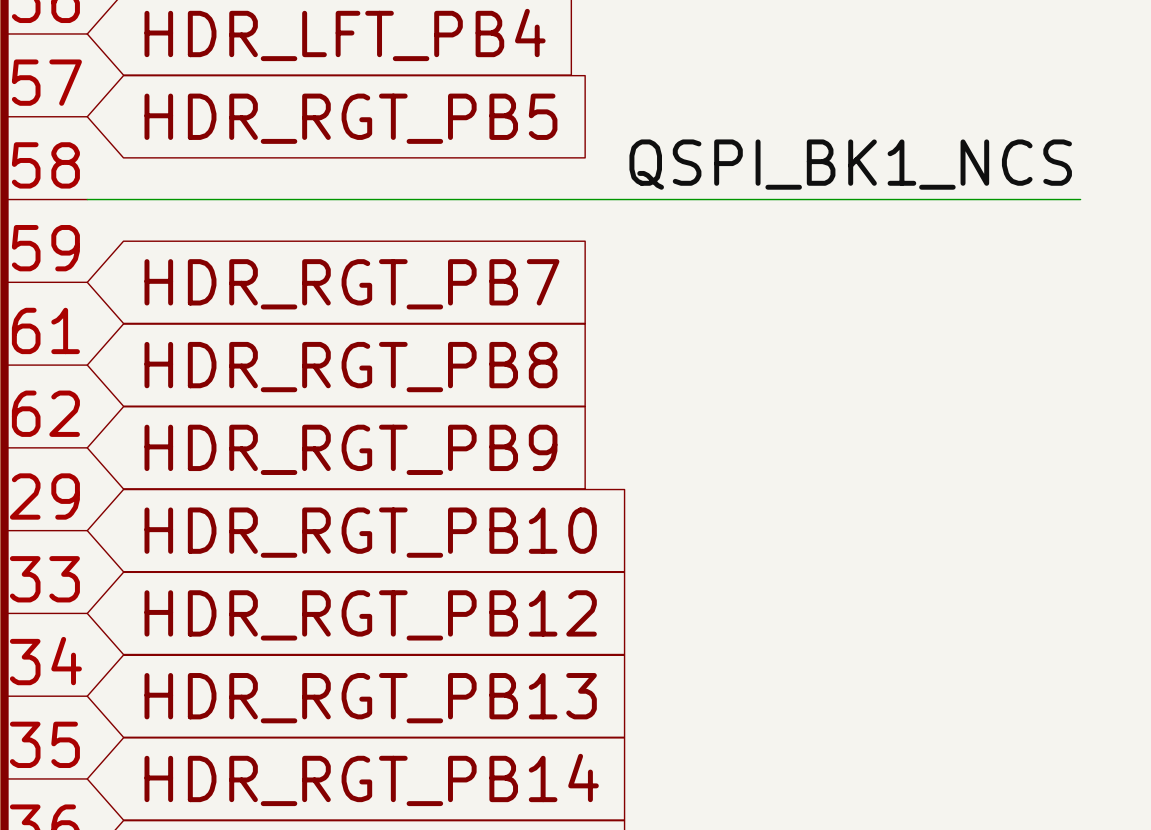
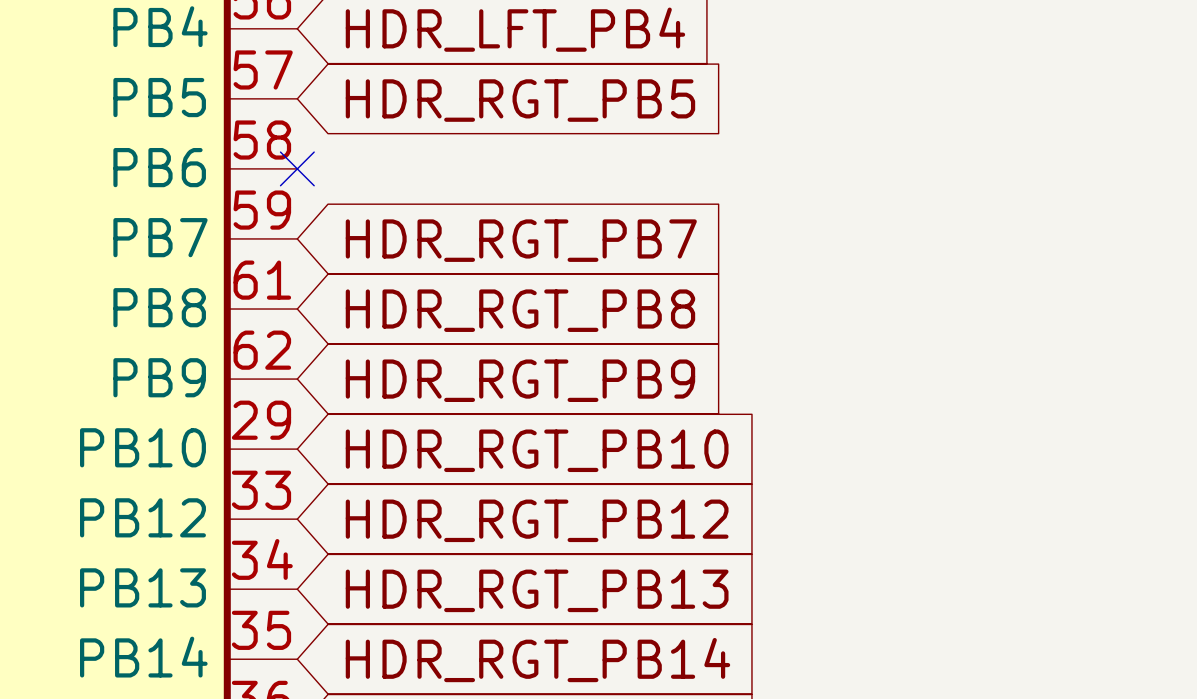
label: QSPI_BK1_NCS (850, 164) -> none
wire: (87, 199) (1080, 199) -> none
no-connect mark: none -> (297, 168)

